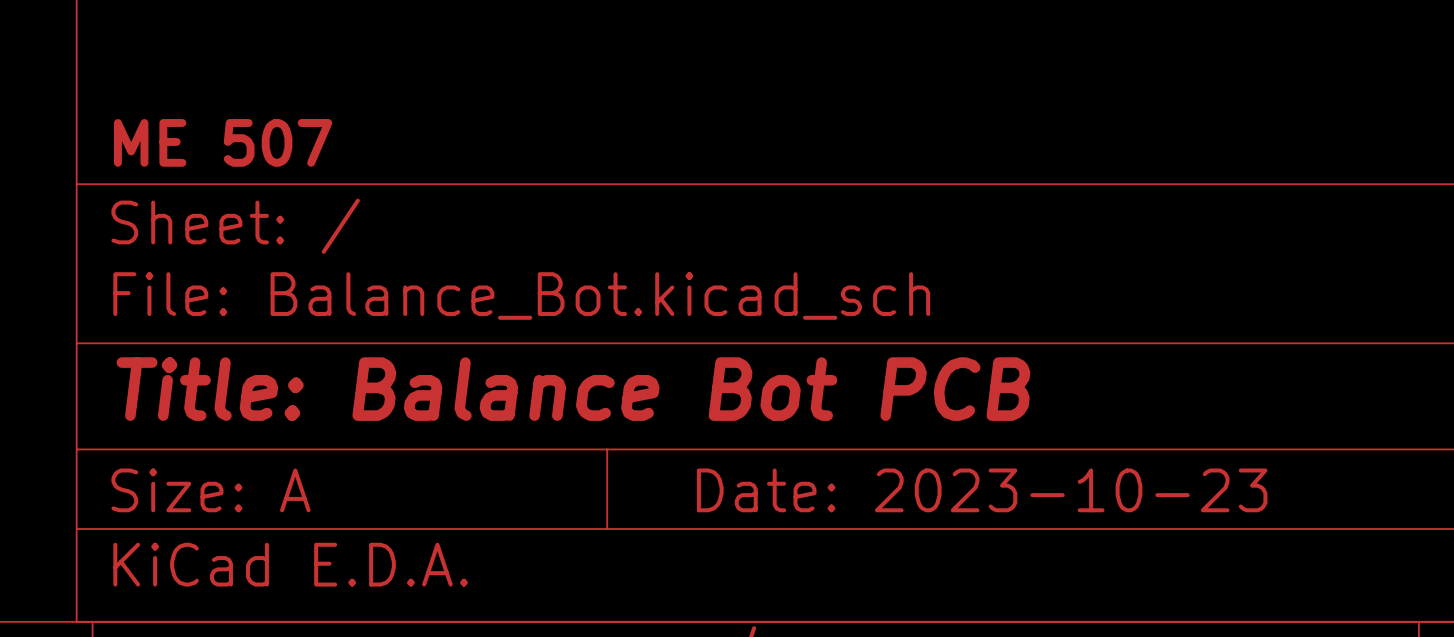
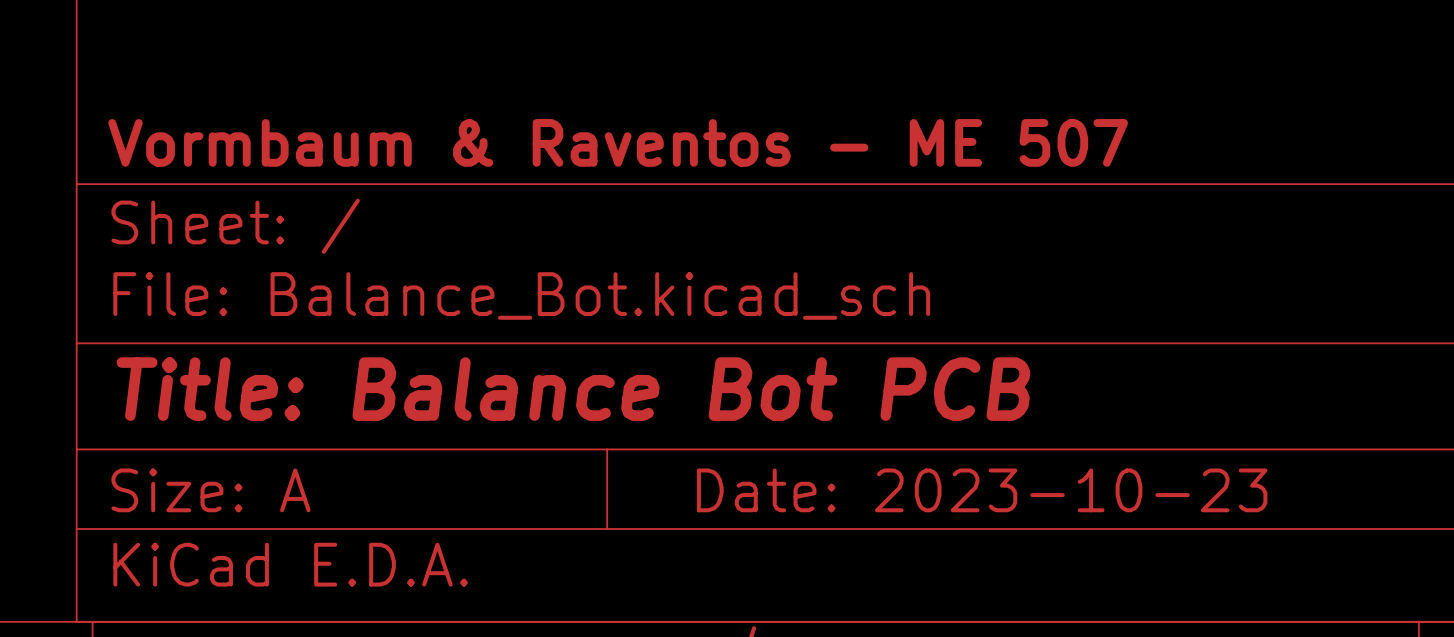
title block: ME 507 (223, 142) -> Vormbaum & Raventos - ME 507 (618, 142)

